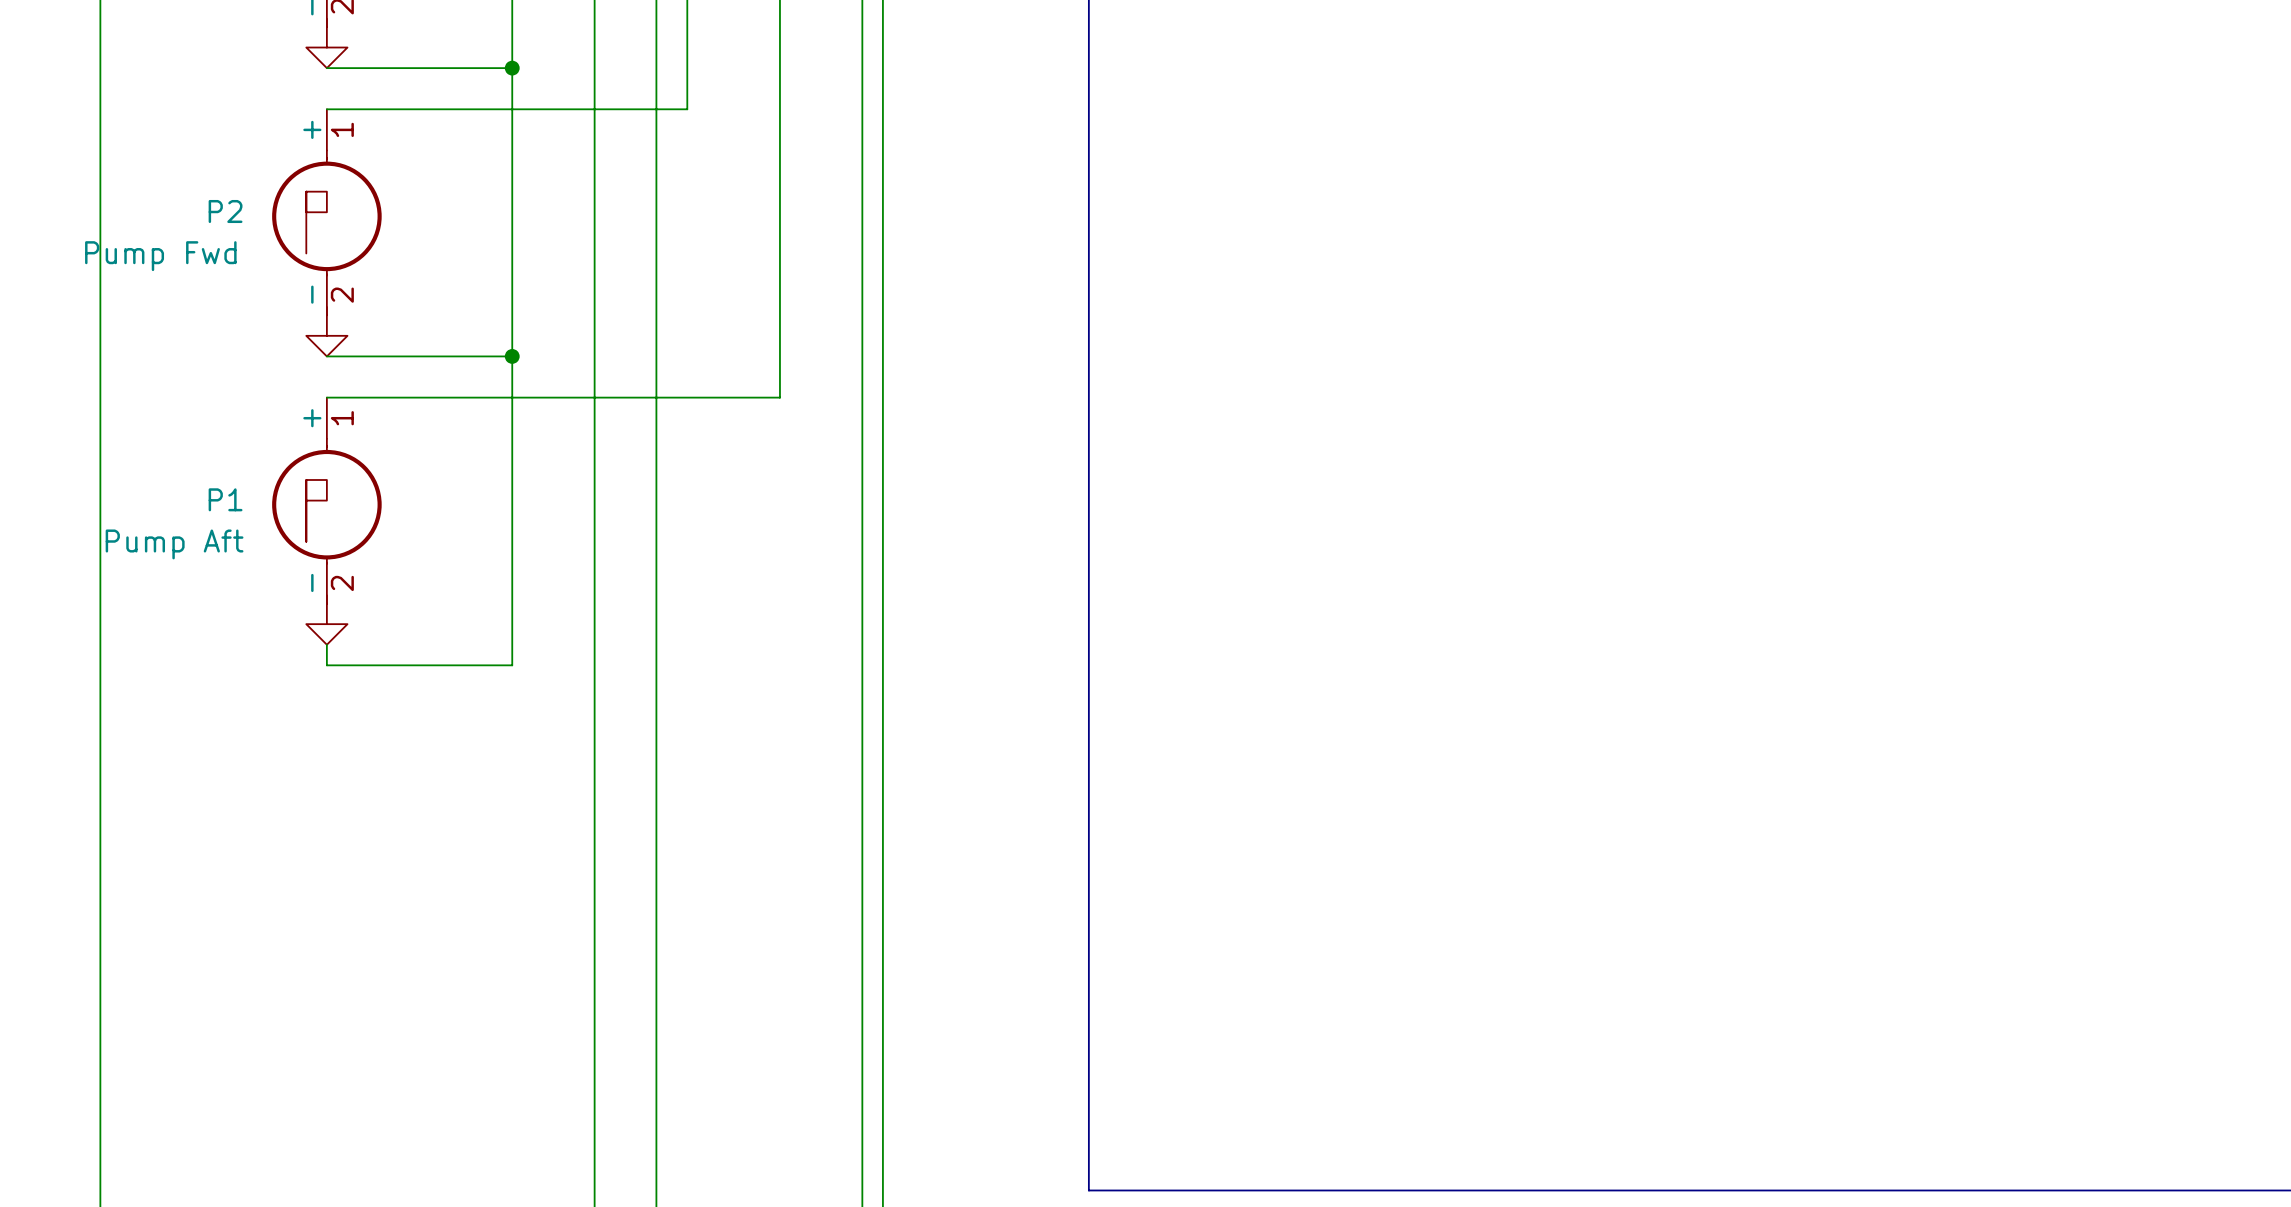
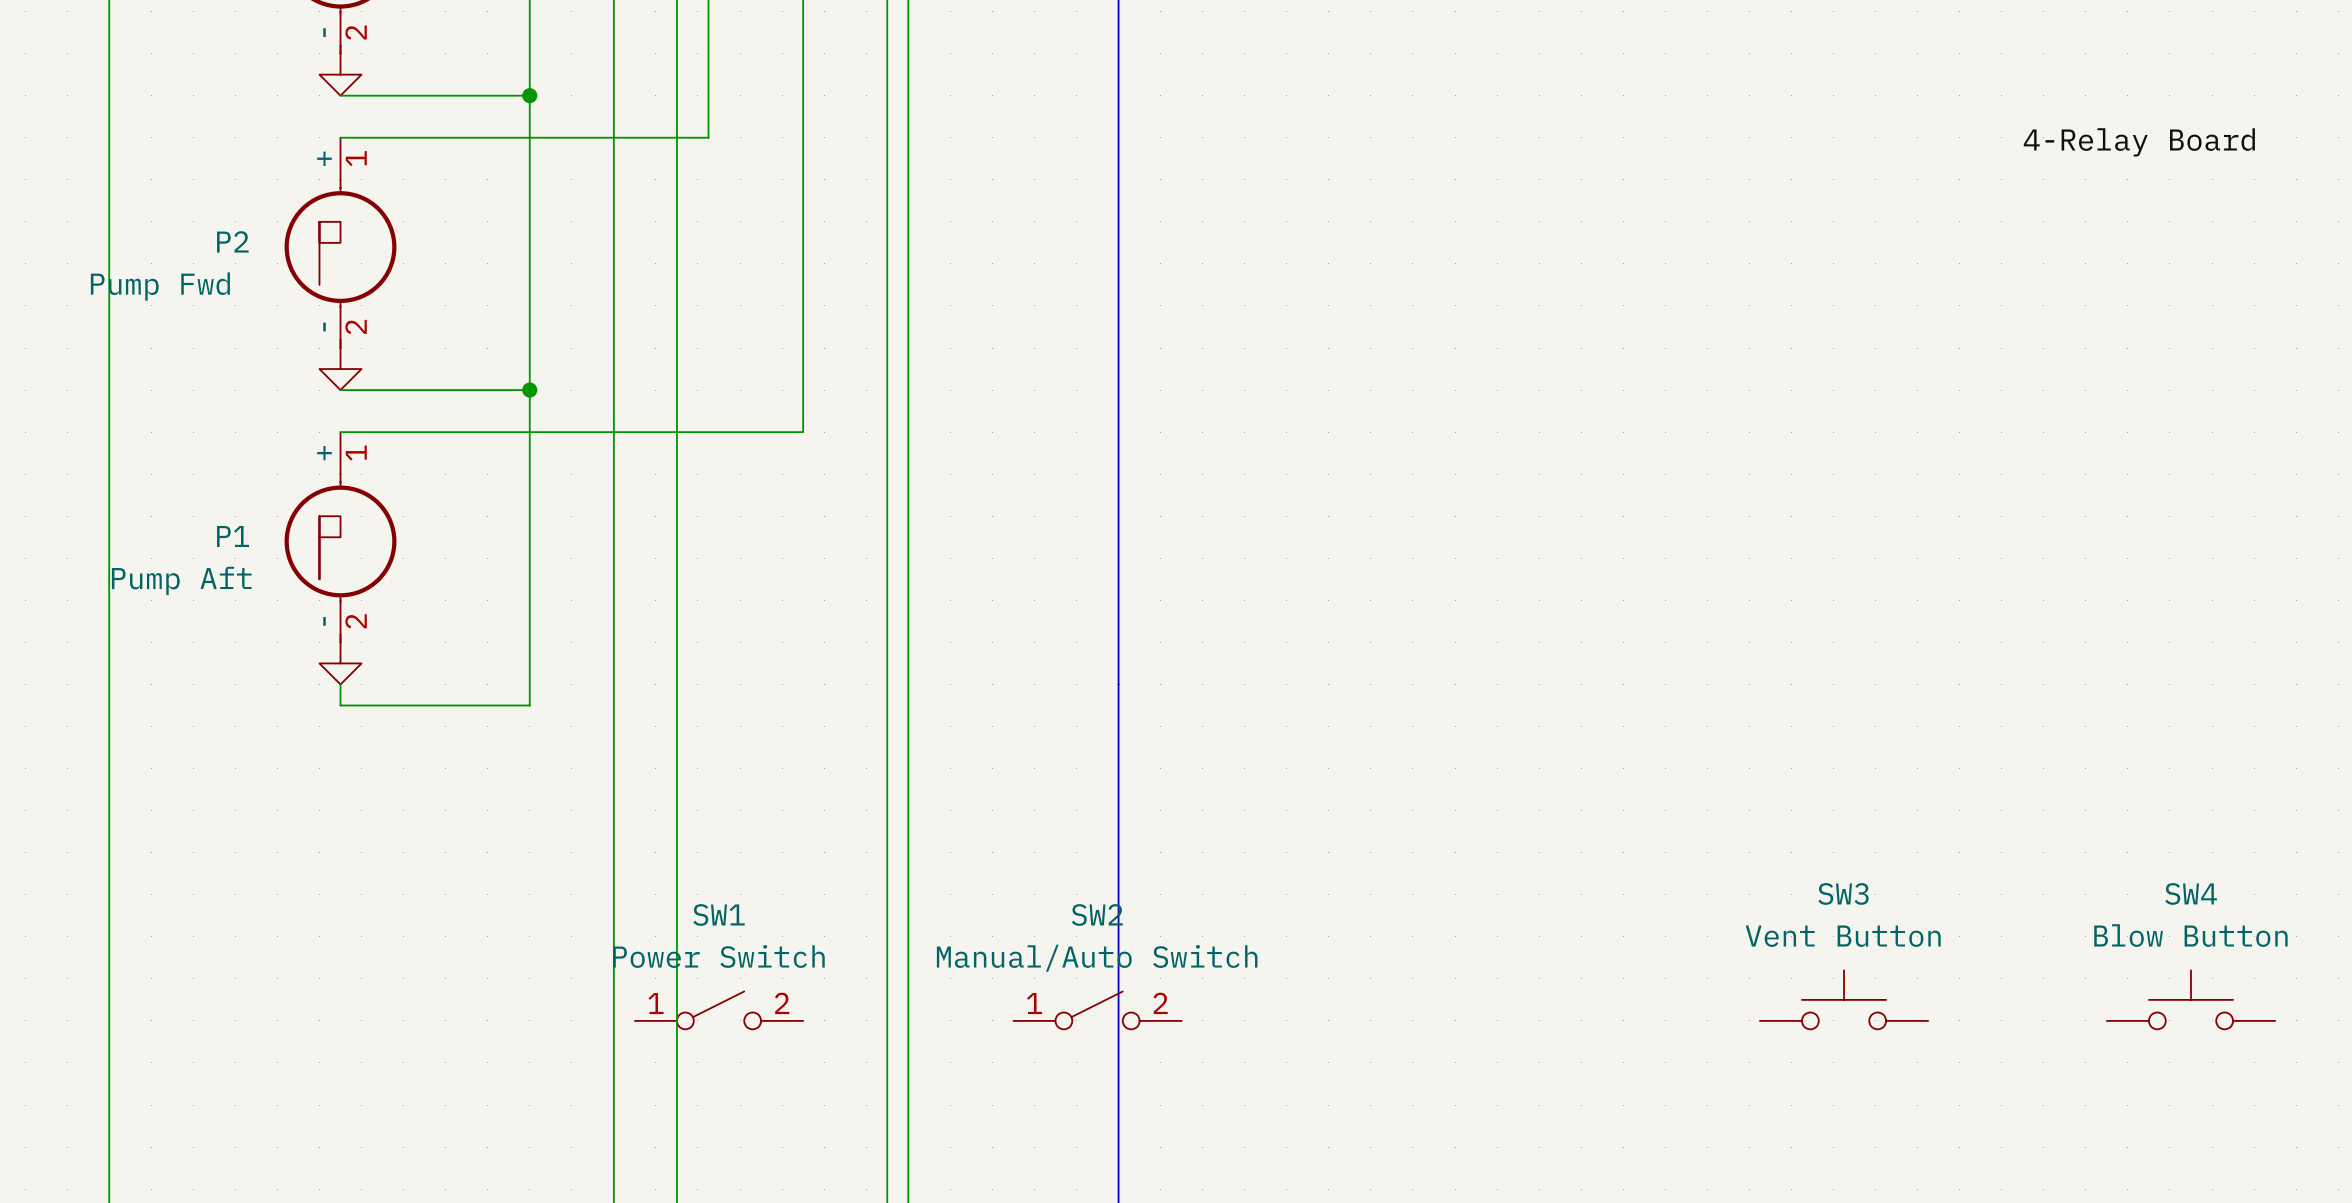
label: none -> 4-Relay Board (2139, 142)
SW3: none -> Vent Button (1844, 999)
SW4: none -> Blow Button (2190, 999)
SW1: none -> Power Switch (719, 1010)
SW2: none -> Manual/Auto Switch (1097, 1010)

